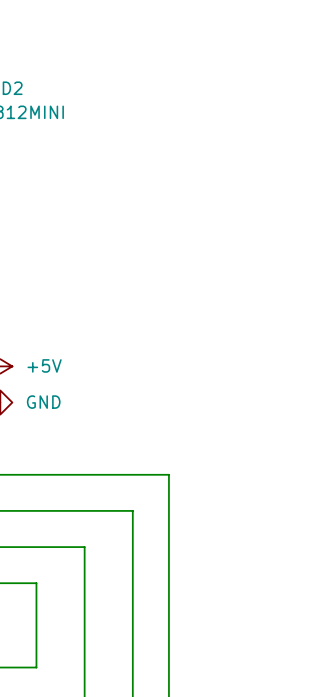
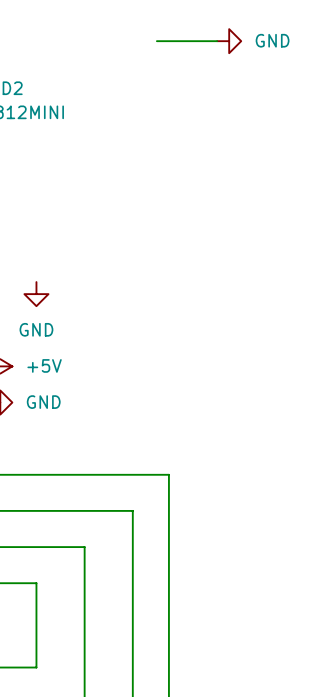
wire: none -> (156, 41) (217, 41)
power symbol: none -> GND (229, 41)
power symbol: none -> GND (36, 294)

